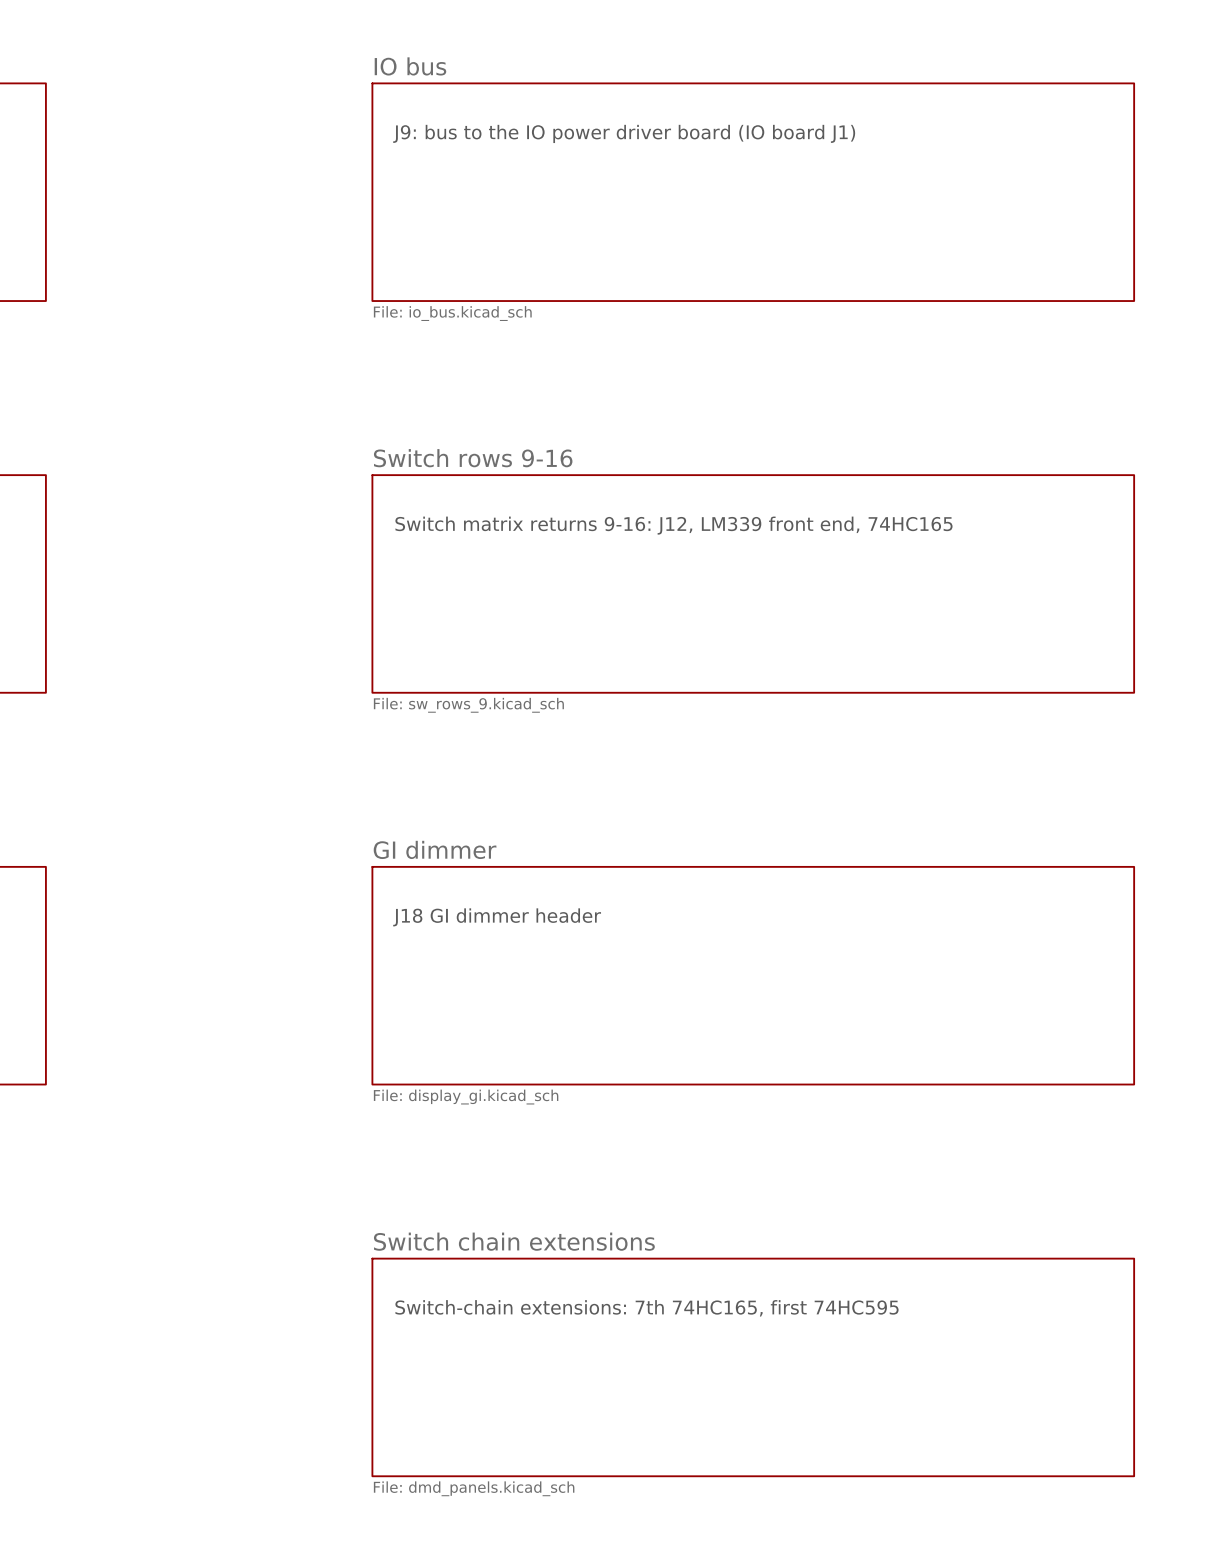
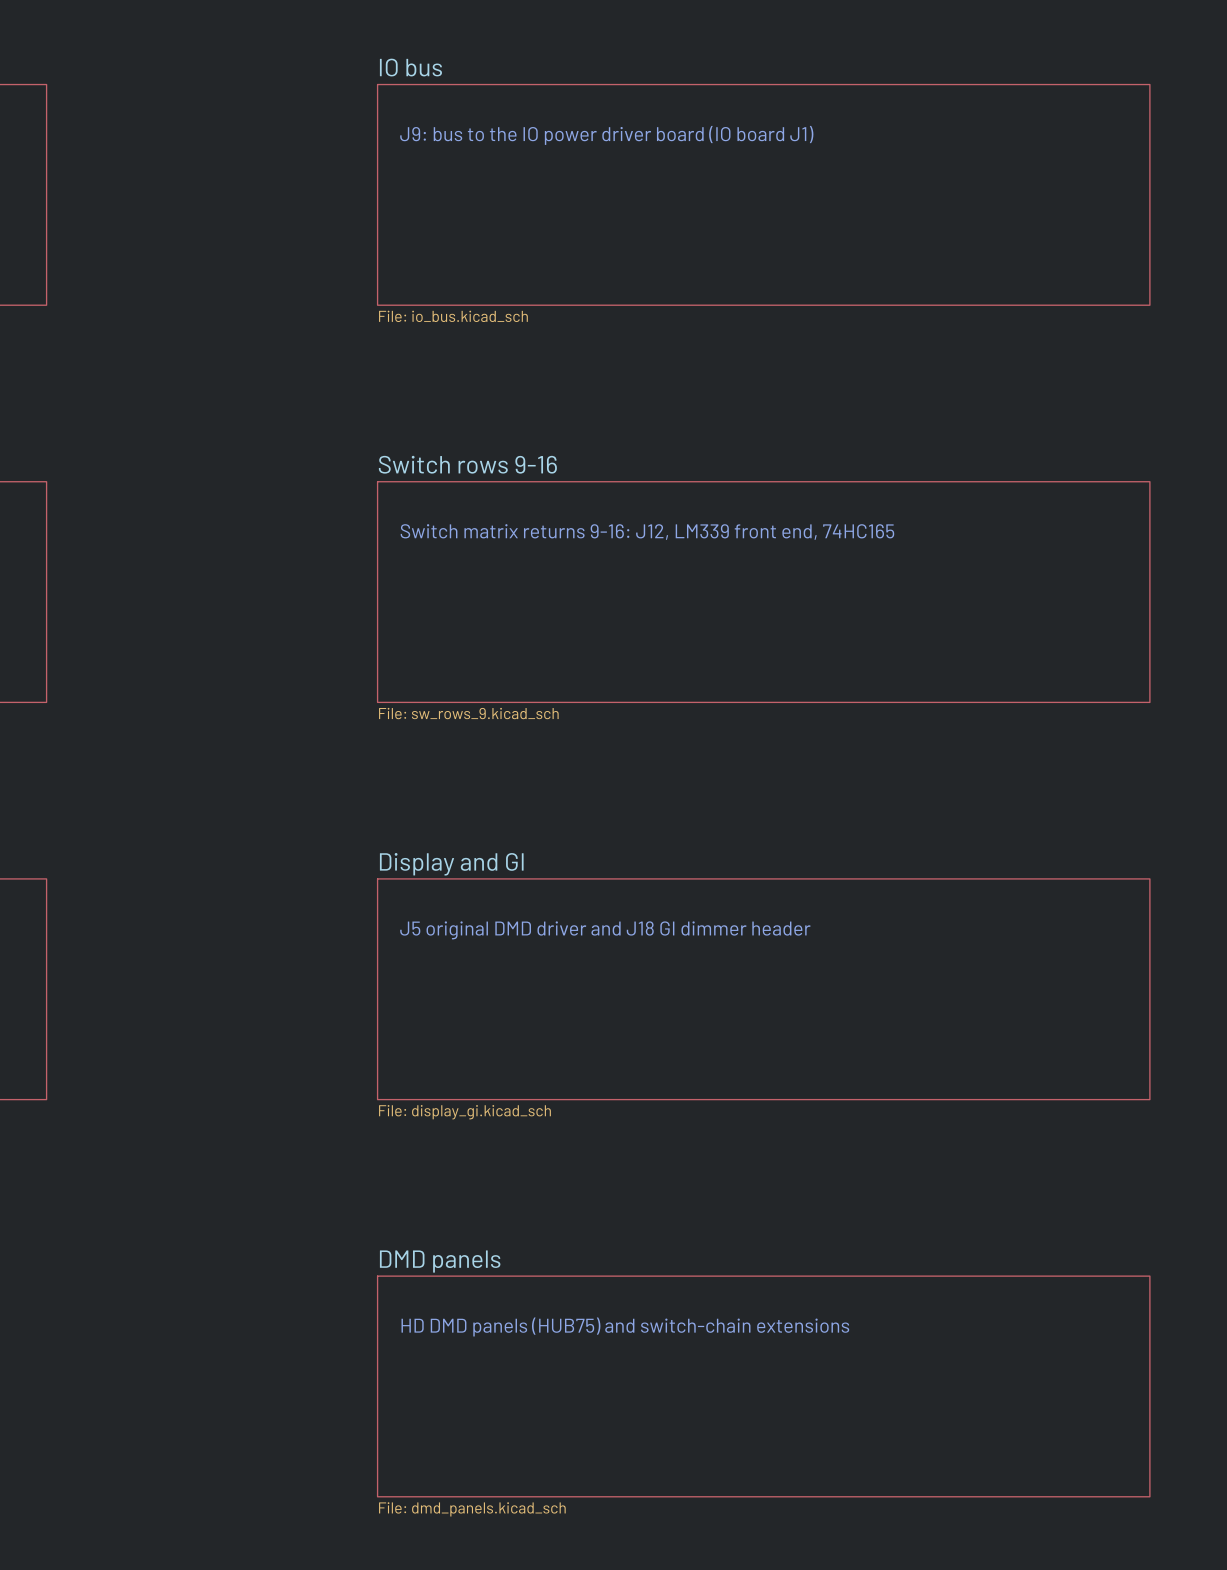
sheet GI dimmer name: GI dimmer (435, 849) -> Display and GI (451, 864)
text: J18 GI dimmer header (497, 917) -> J5 original DMD driver and J18 GI dimmer header (605, 930)
sheet Switch chain extensions name: Switch chain extensions (514, 1241) -> DMD panels (440, 1261)
text: Switch-chain extensions: 7th 74HC165, first 74HC595 (646, 1308) -> HD DMD panels (HUB75) and switch-chain extensions (625, 1326)

